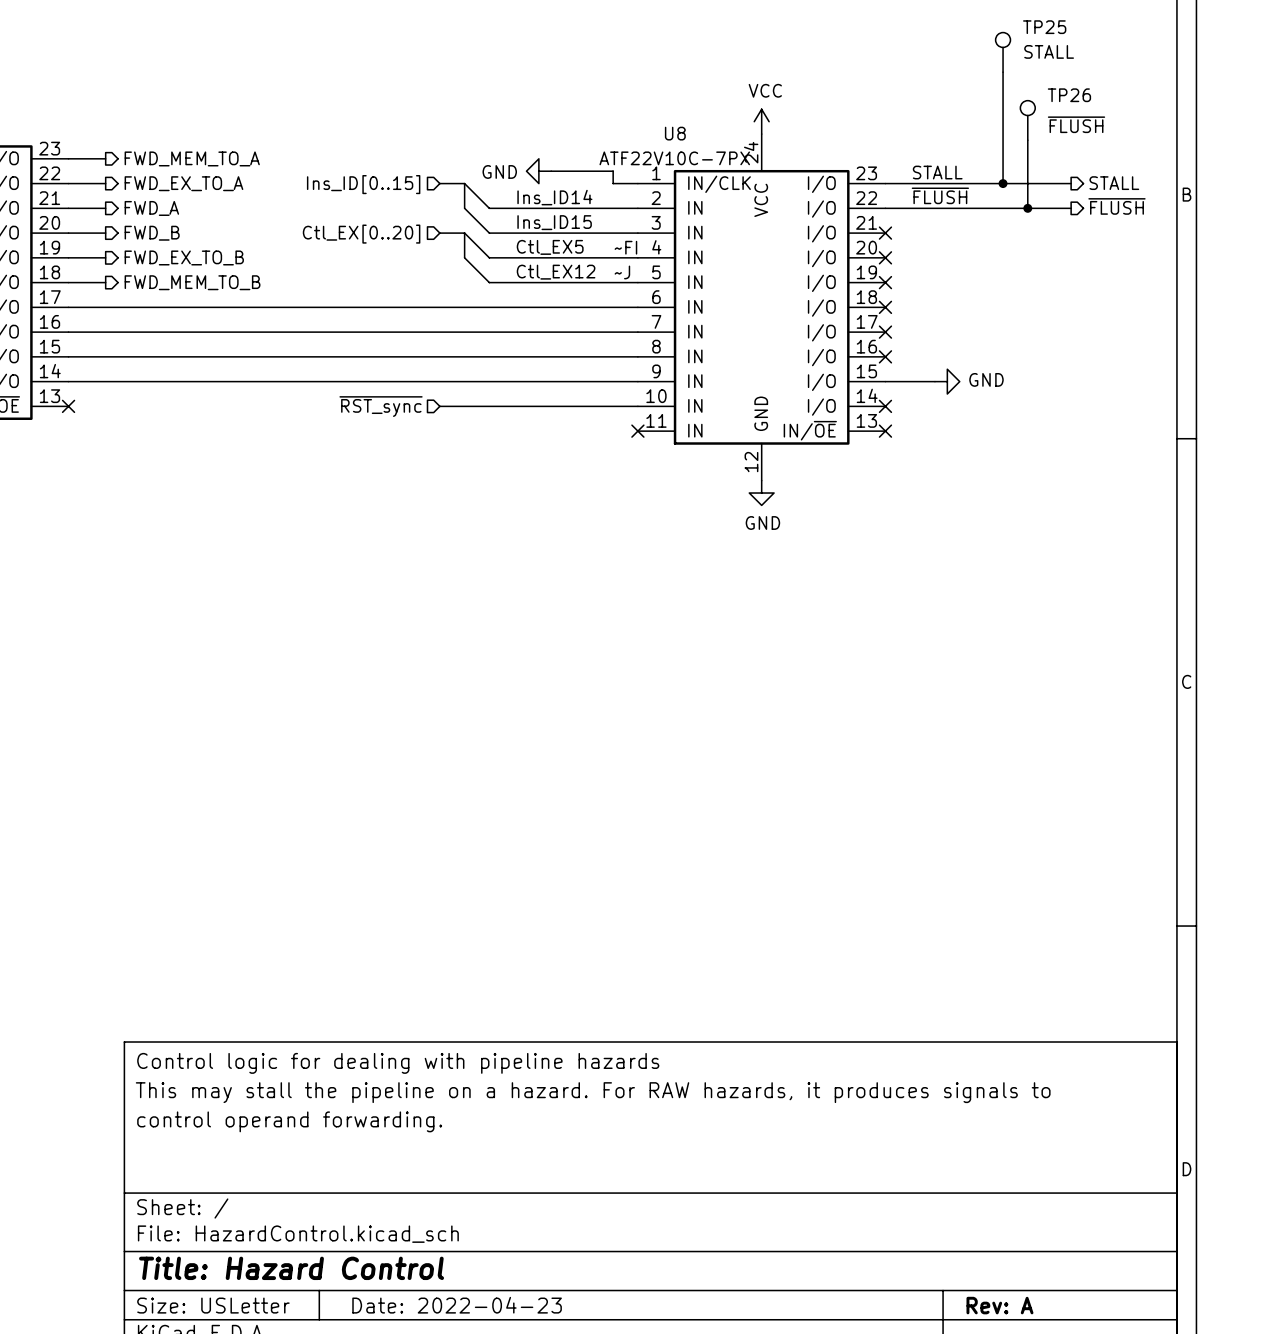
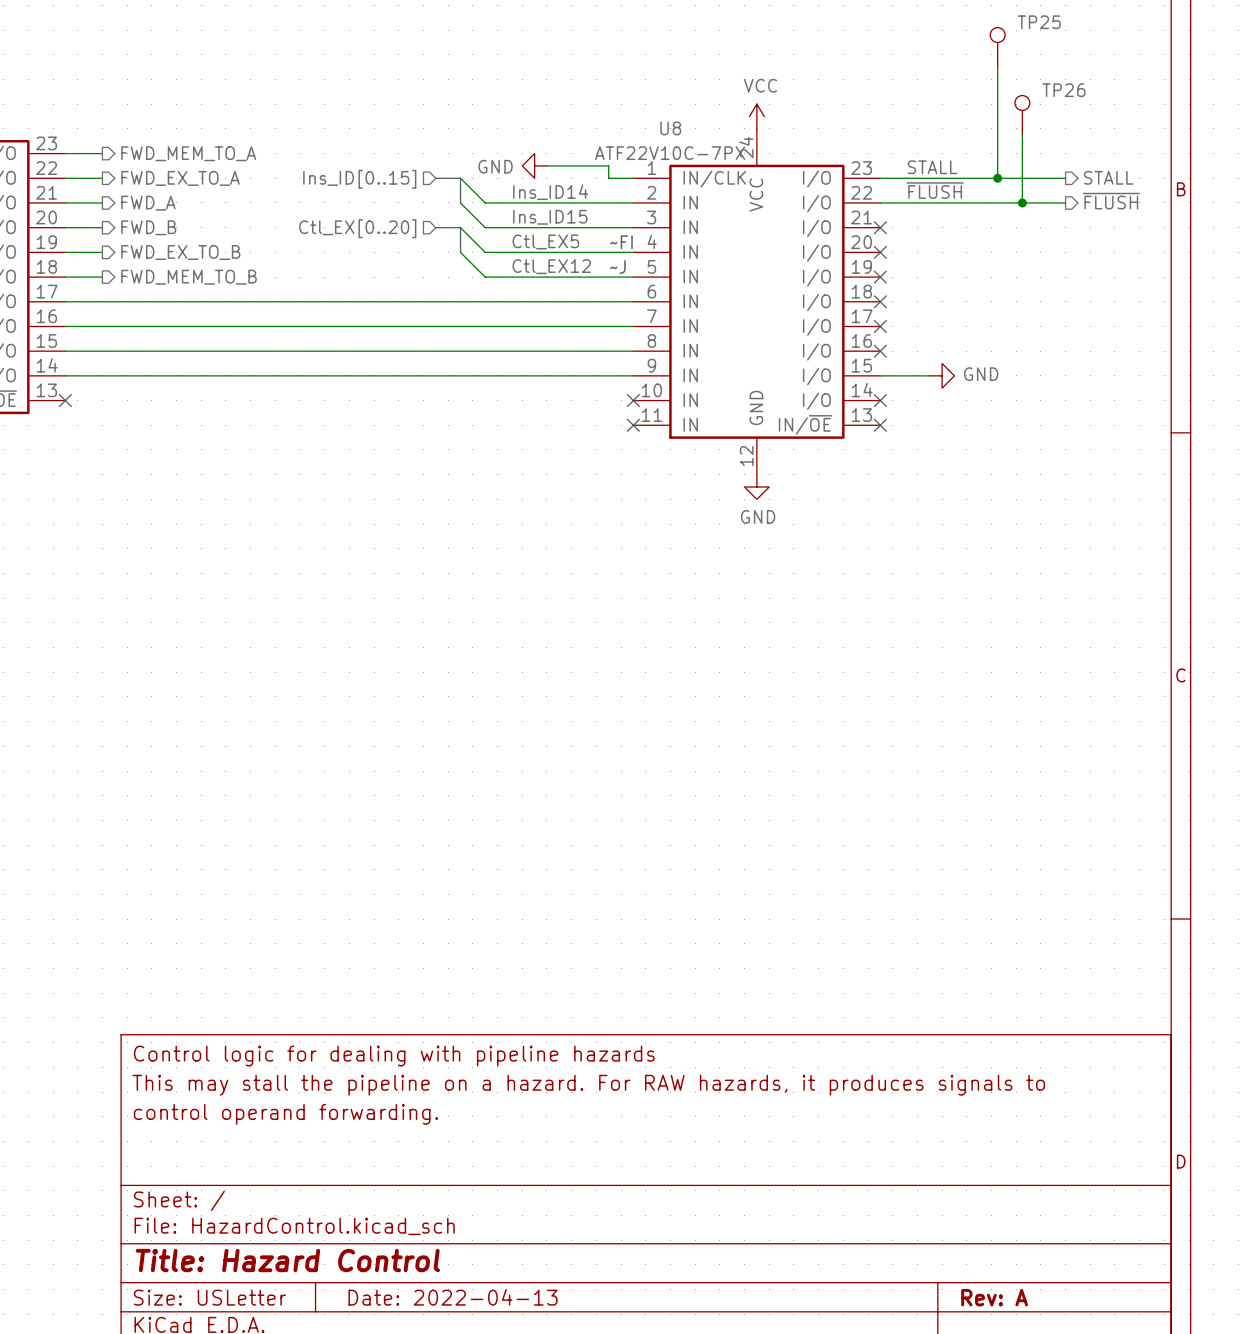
TP25 value: STALL (1049, 51) -> none
TP26 value: ~{FLUSH} (1076, 124) -> none
hierarchical label: ~{RST_sync} (381, 406) -> none
wire: (439, 406) (637, 406) -> none
no-connect mark: none -> (633, 400)
title block: Date: 2022-04-23 (457, 1305) -> Date: 2022-04-13 (452, 1297)

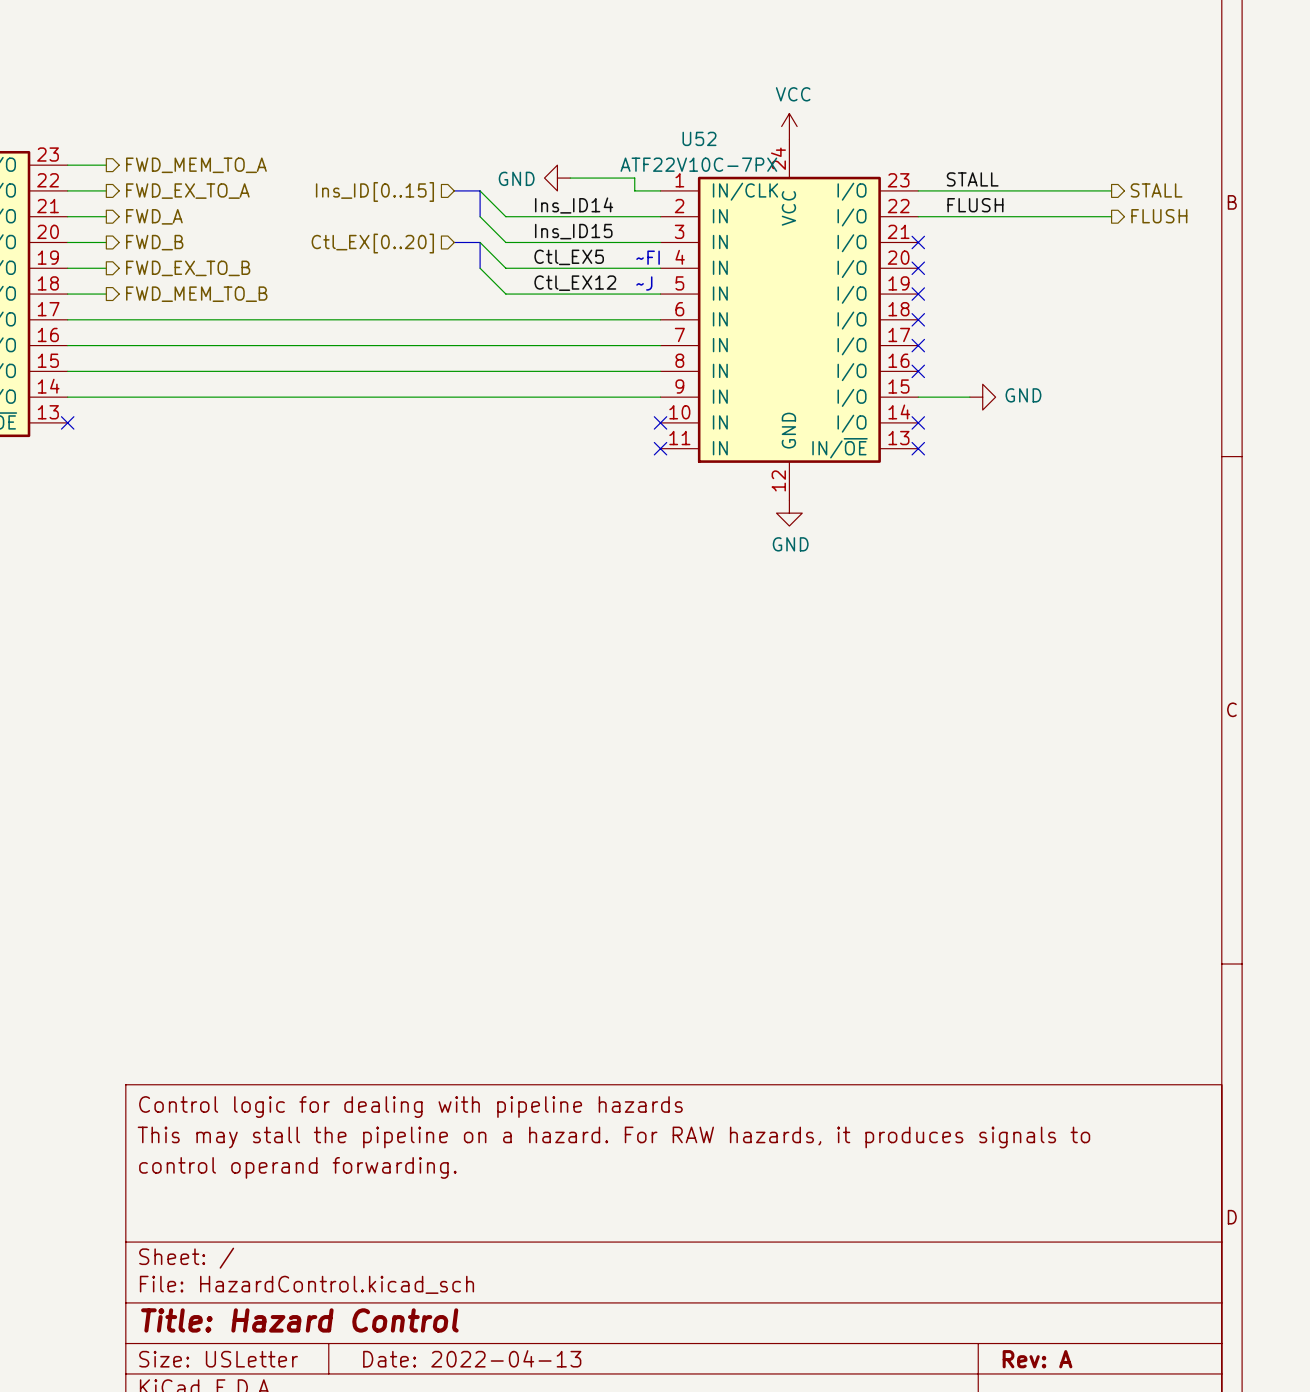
TP25: (997, 47) -> none
wire: (997, 67) (997, 178) -> none
TP26: (1022, 115) -> none
U8 name: U8 (670, 128) -> U52 (699, 138)
wire: (1022, 135) (1022, 202) -> none
junction: (997, 178) -> none
label: ~{FLUSH} (935, 190) -> FLUSH (975, 205)
hierarchical label: ~{FLUSH} (1111, 201) -> FLUSH (1159, 216)
junction: (1022, 202) -> none

